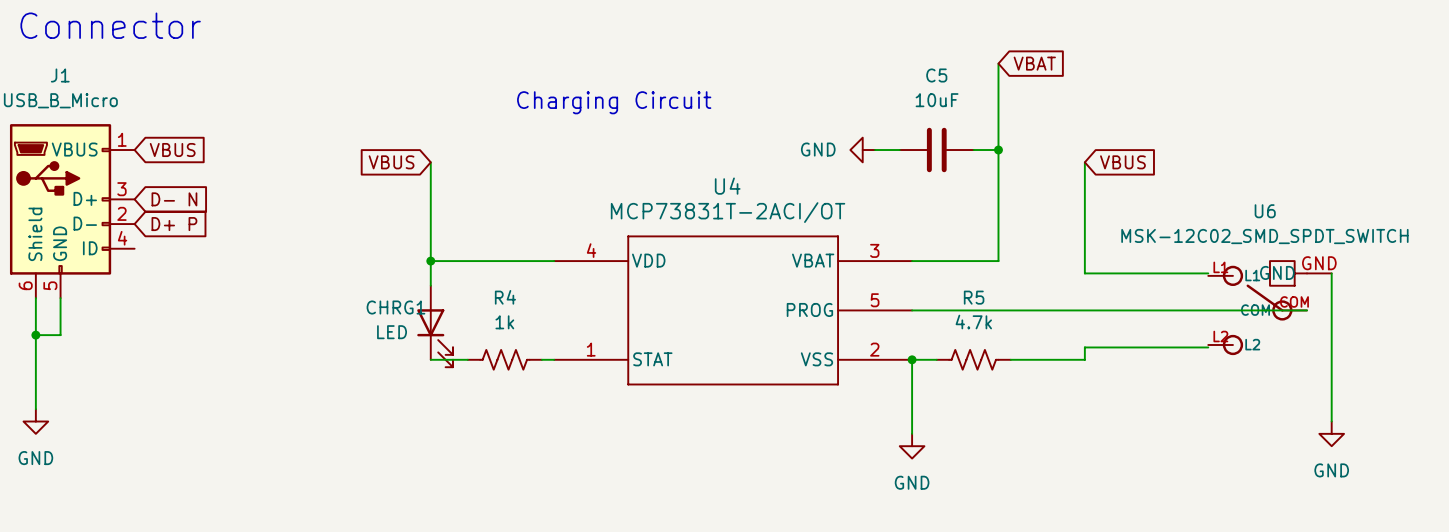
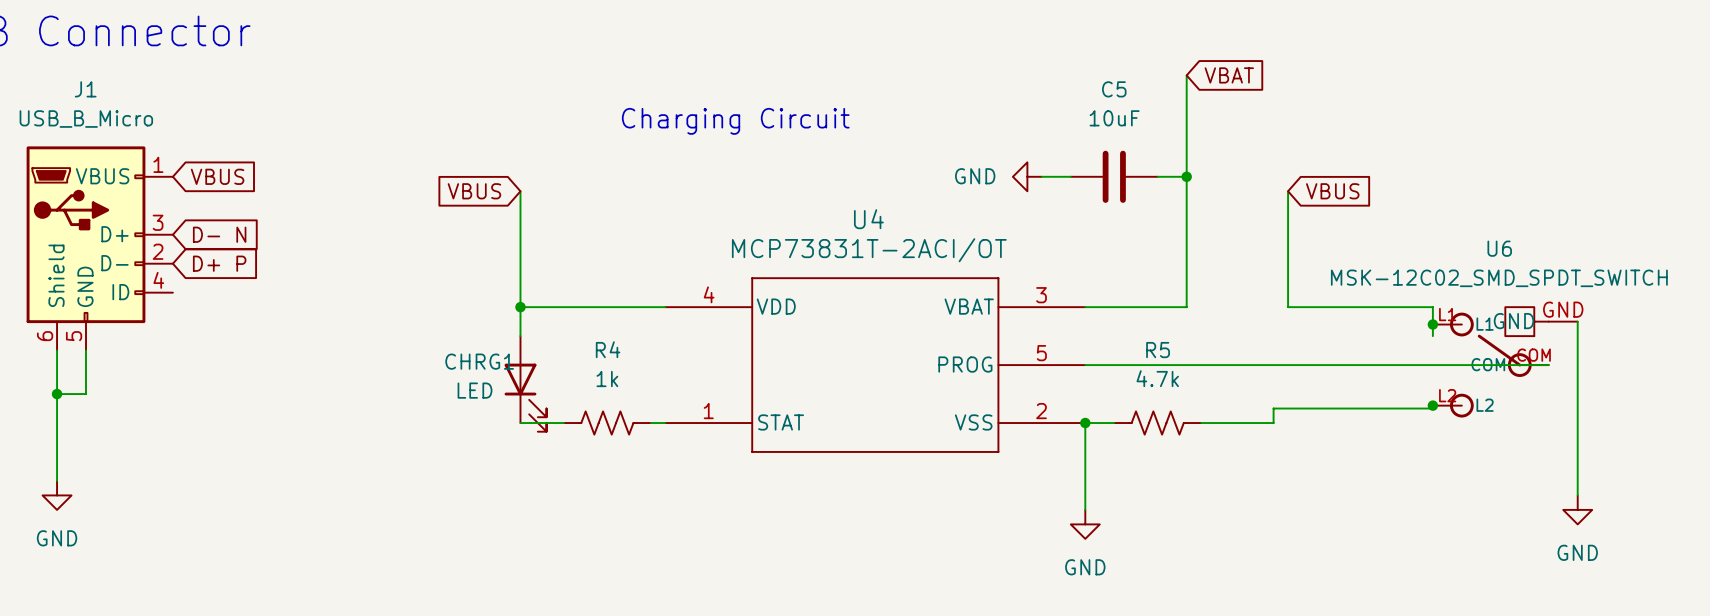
wire: (1084, 261) (1084, 273) (1208, 273) -> (1288, 307) (1432, 307) (1432, 336)
junction: none -> (1432, 324)
junction: none -> (1432, 405)
wire: (1084, 347) (1084, 359) (1072, 359) -> (1288, 408) (1273, 408) (1273, 423)

